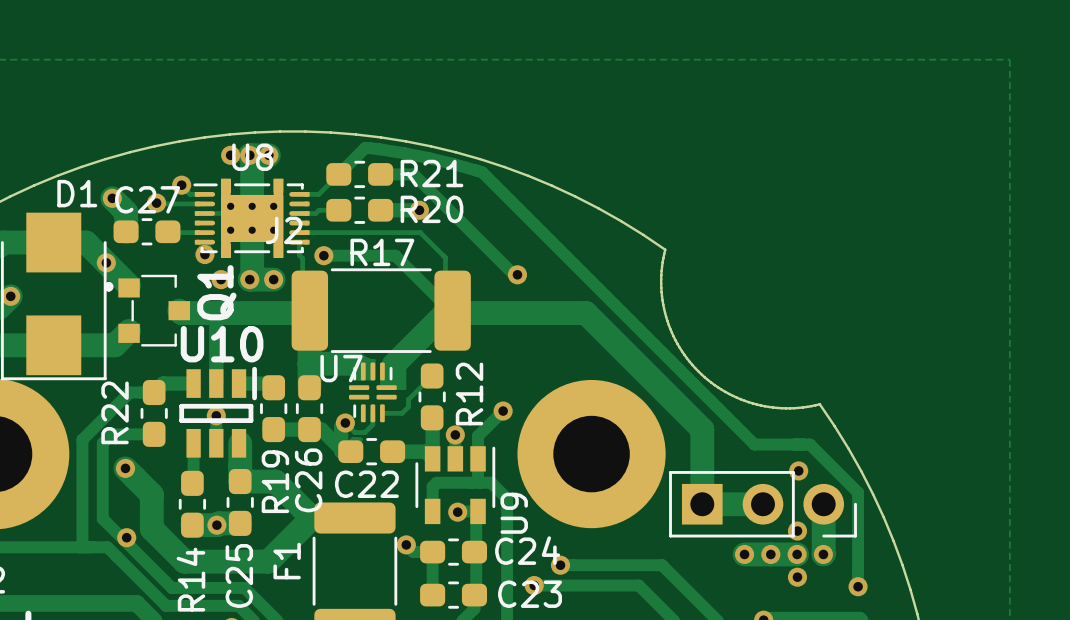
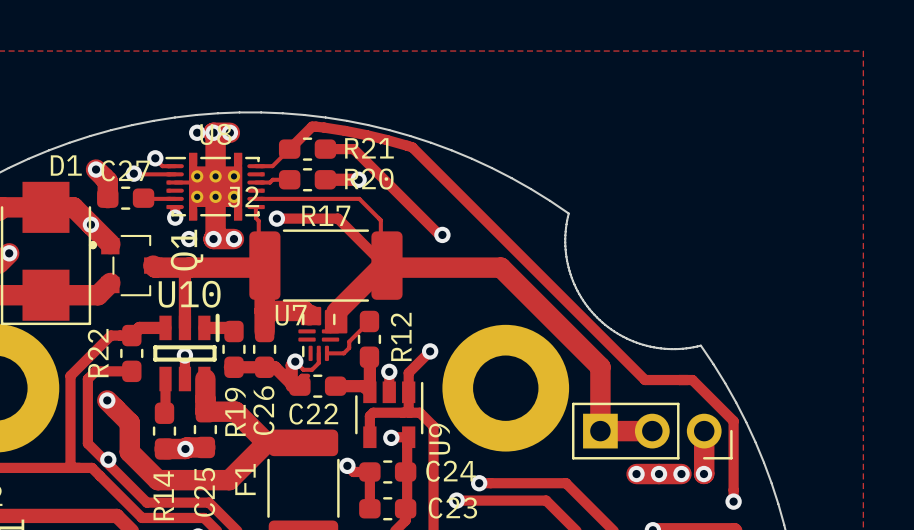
via: (798, 470) -> none
via: (797, 531) -> none
via: (797, 577) -> none

